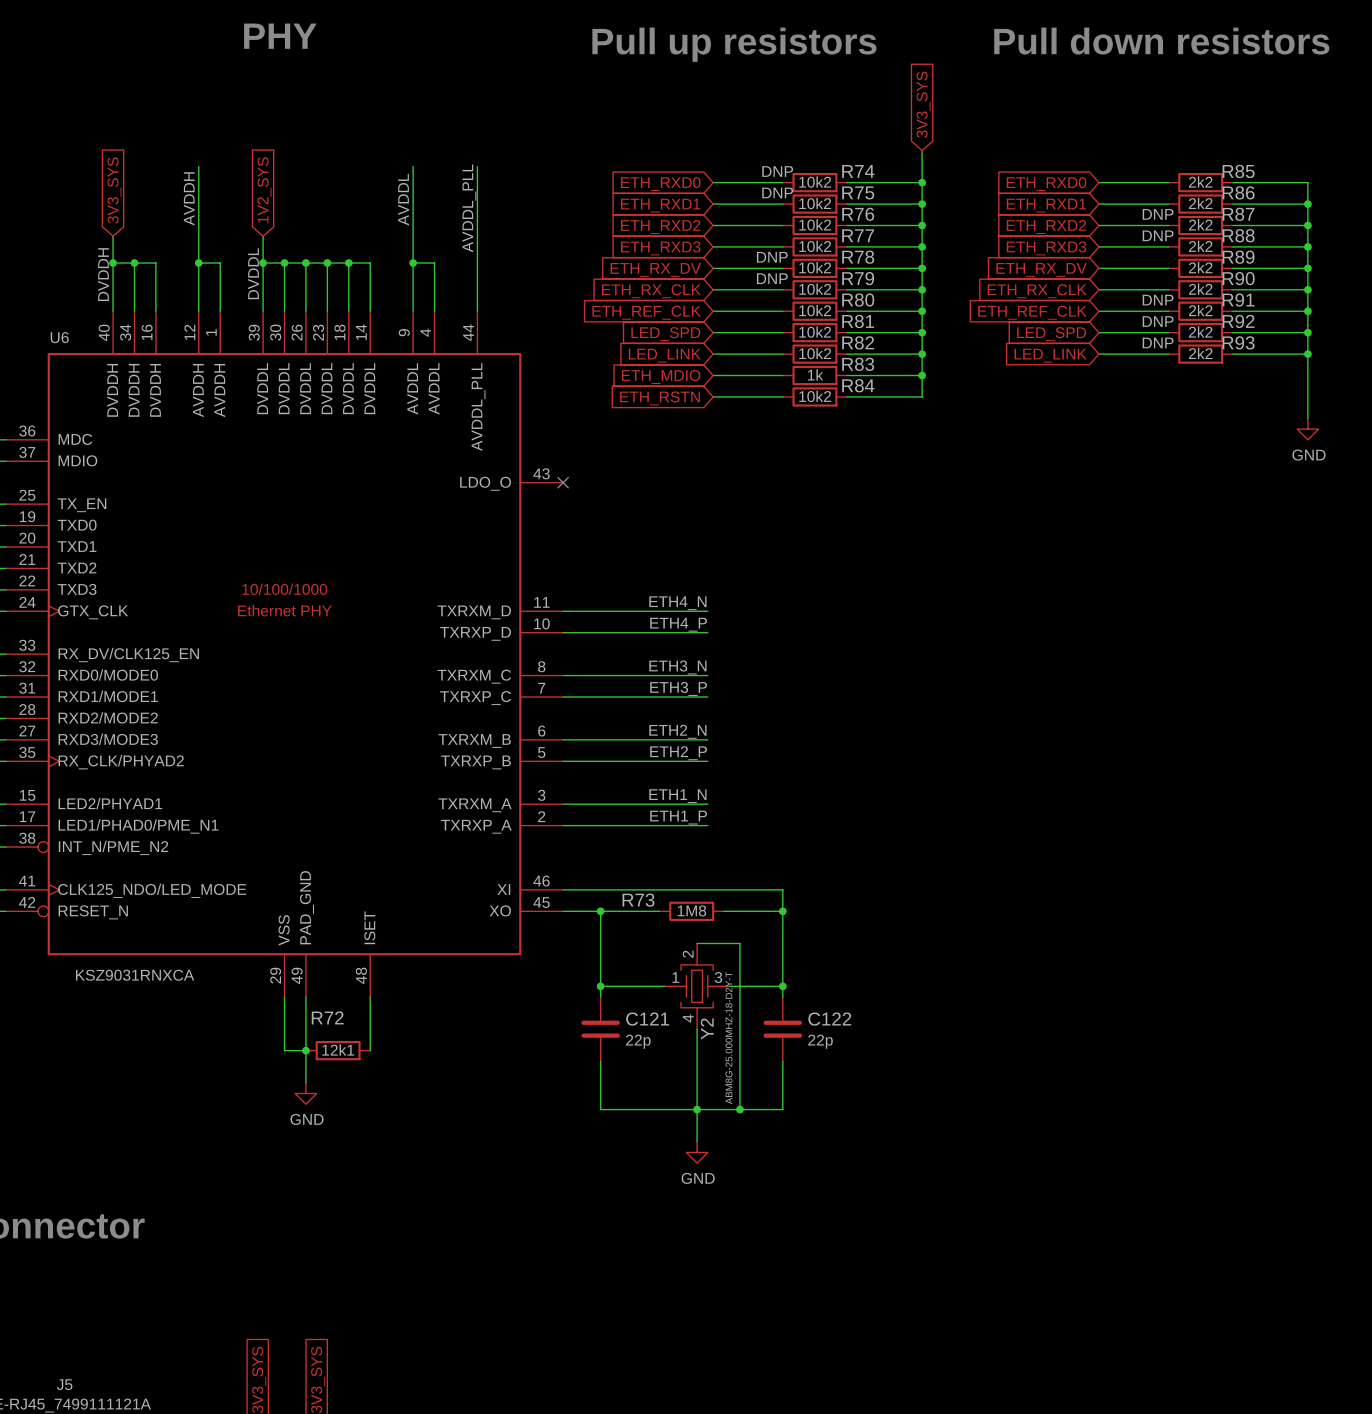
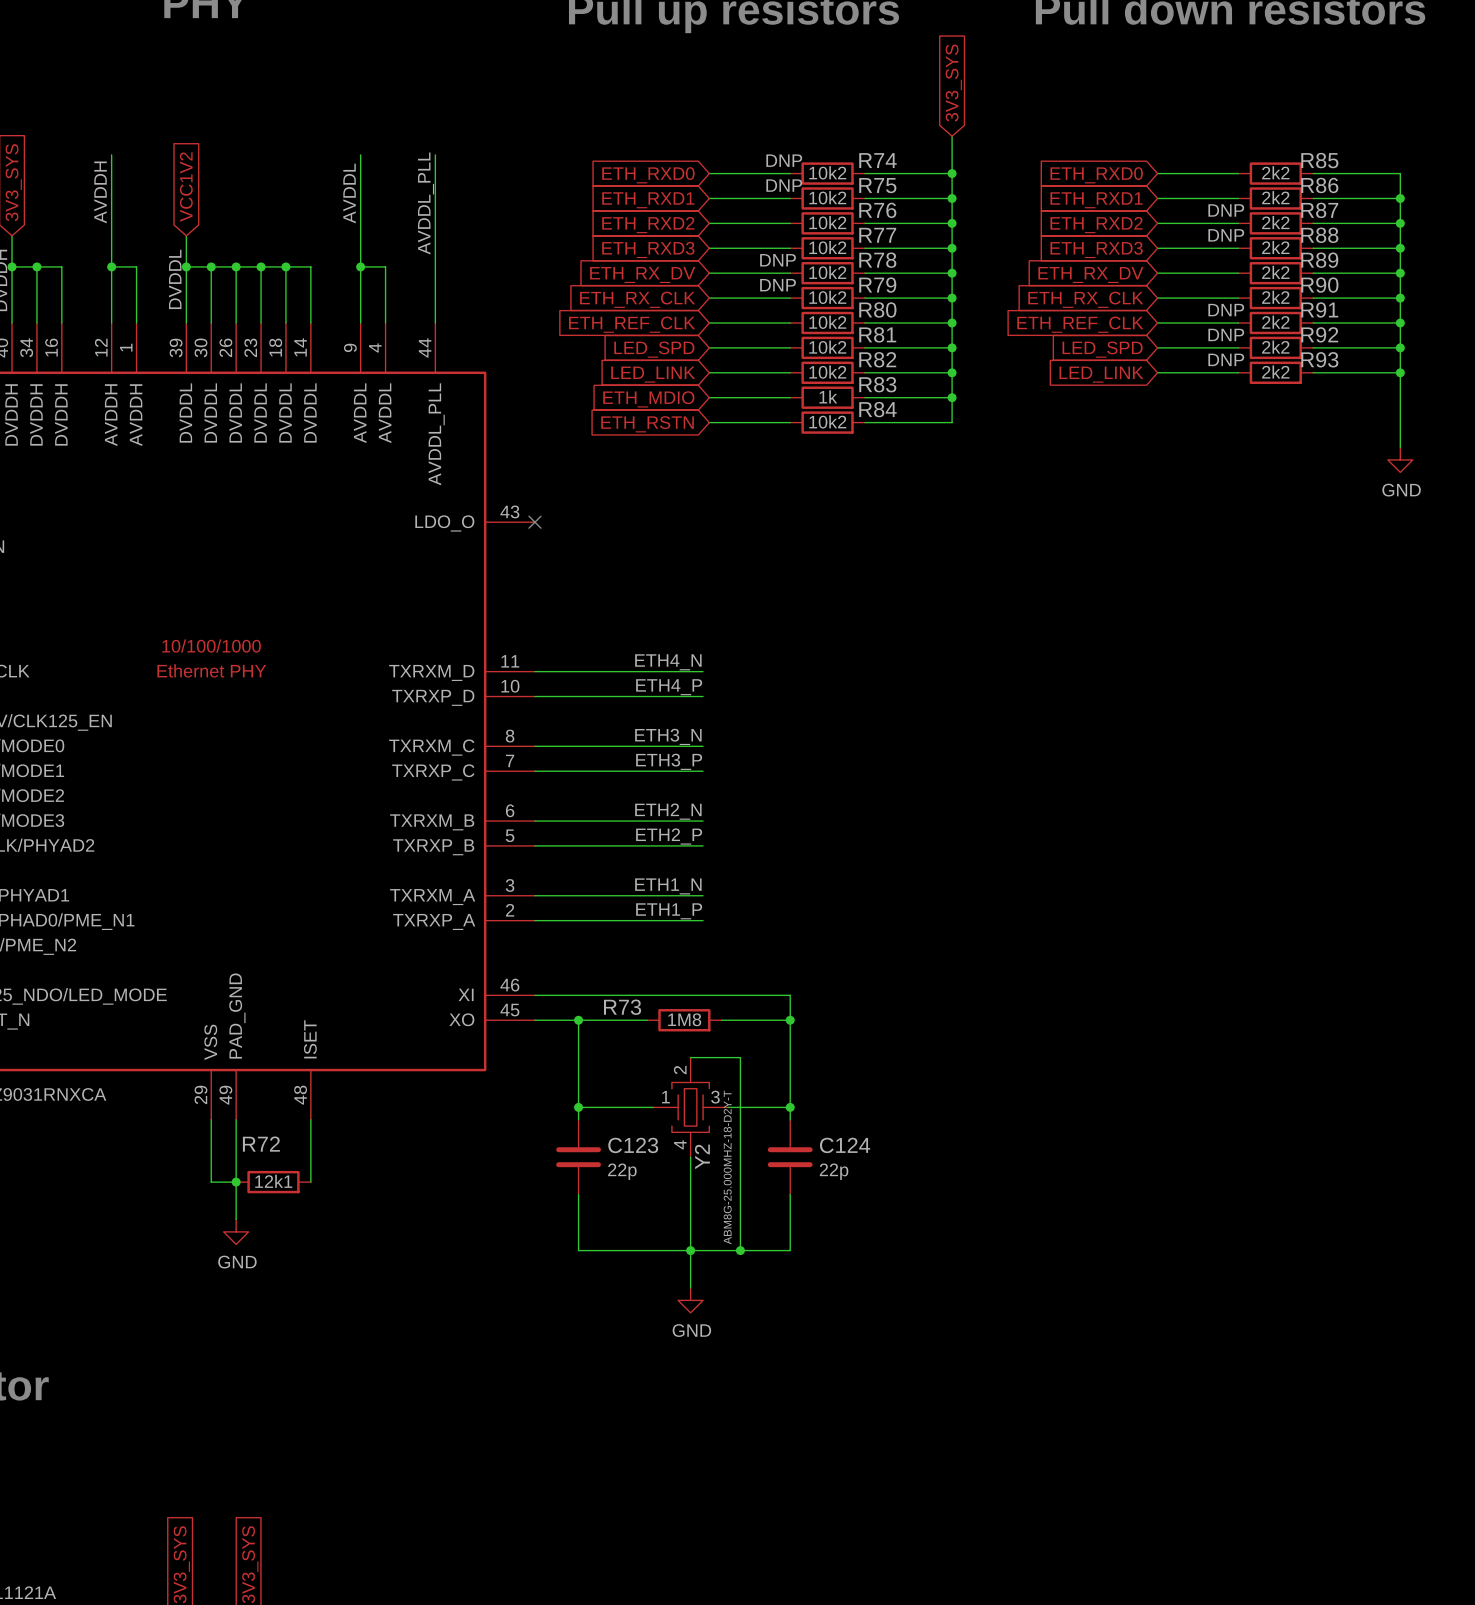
global label: 1V2_SYS (264, 190) -> VCC1V2 (186, 187)
C121 name: C121 (647, 1019) -> C123 (633, 1145)
C122 name: C122 (829, 1019) -> C124 (845, 1145)

